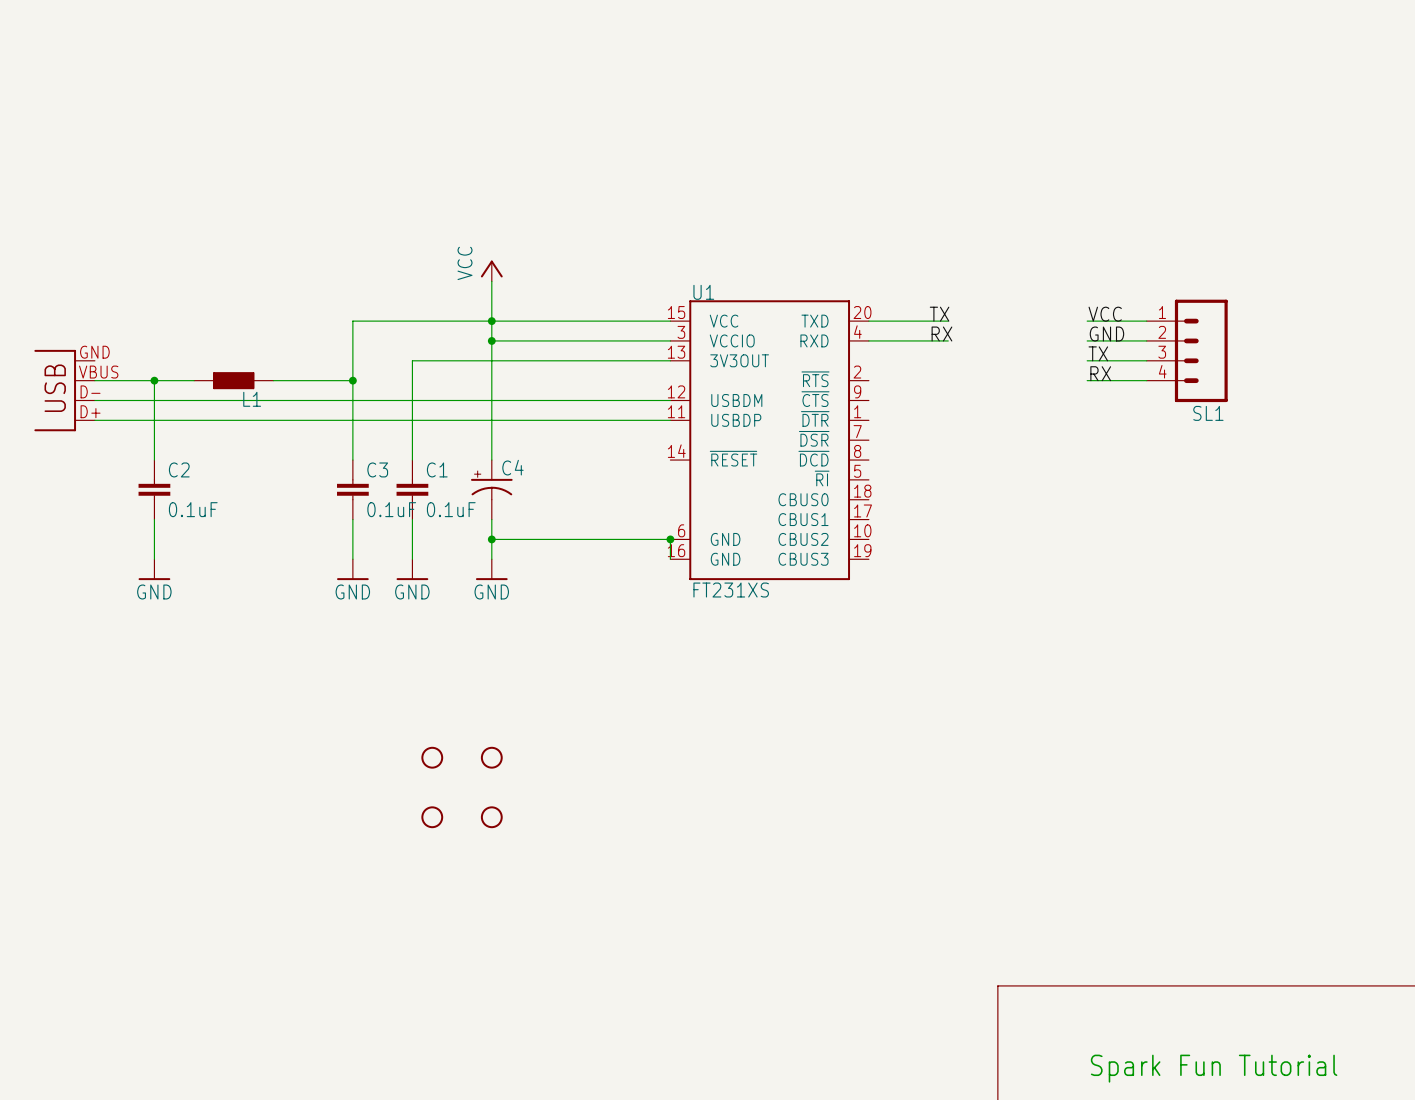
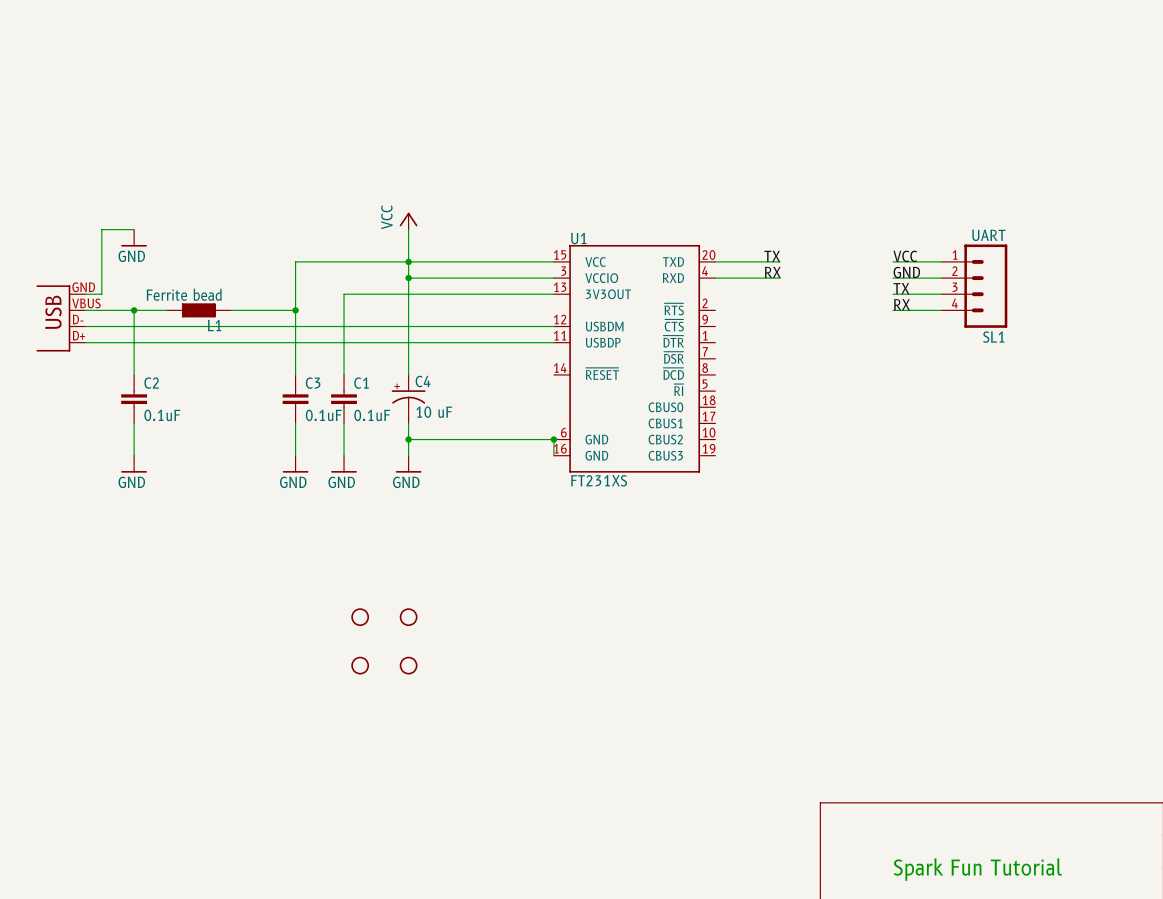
wire: none -> (134, 229) (101, 229) (101, 294) (85, 294)
SL1 value: none -> UART (988, 235)
power symbol: none -> GND (134, 238)
L1 value: none -> Ferrite bead (184, 294)
C4 value: none -> 10 uF (434, 412)

